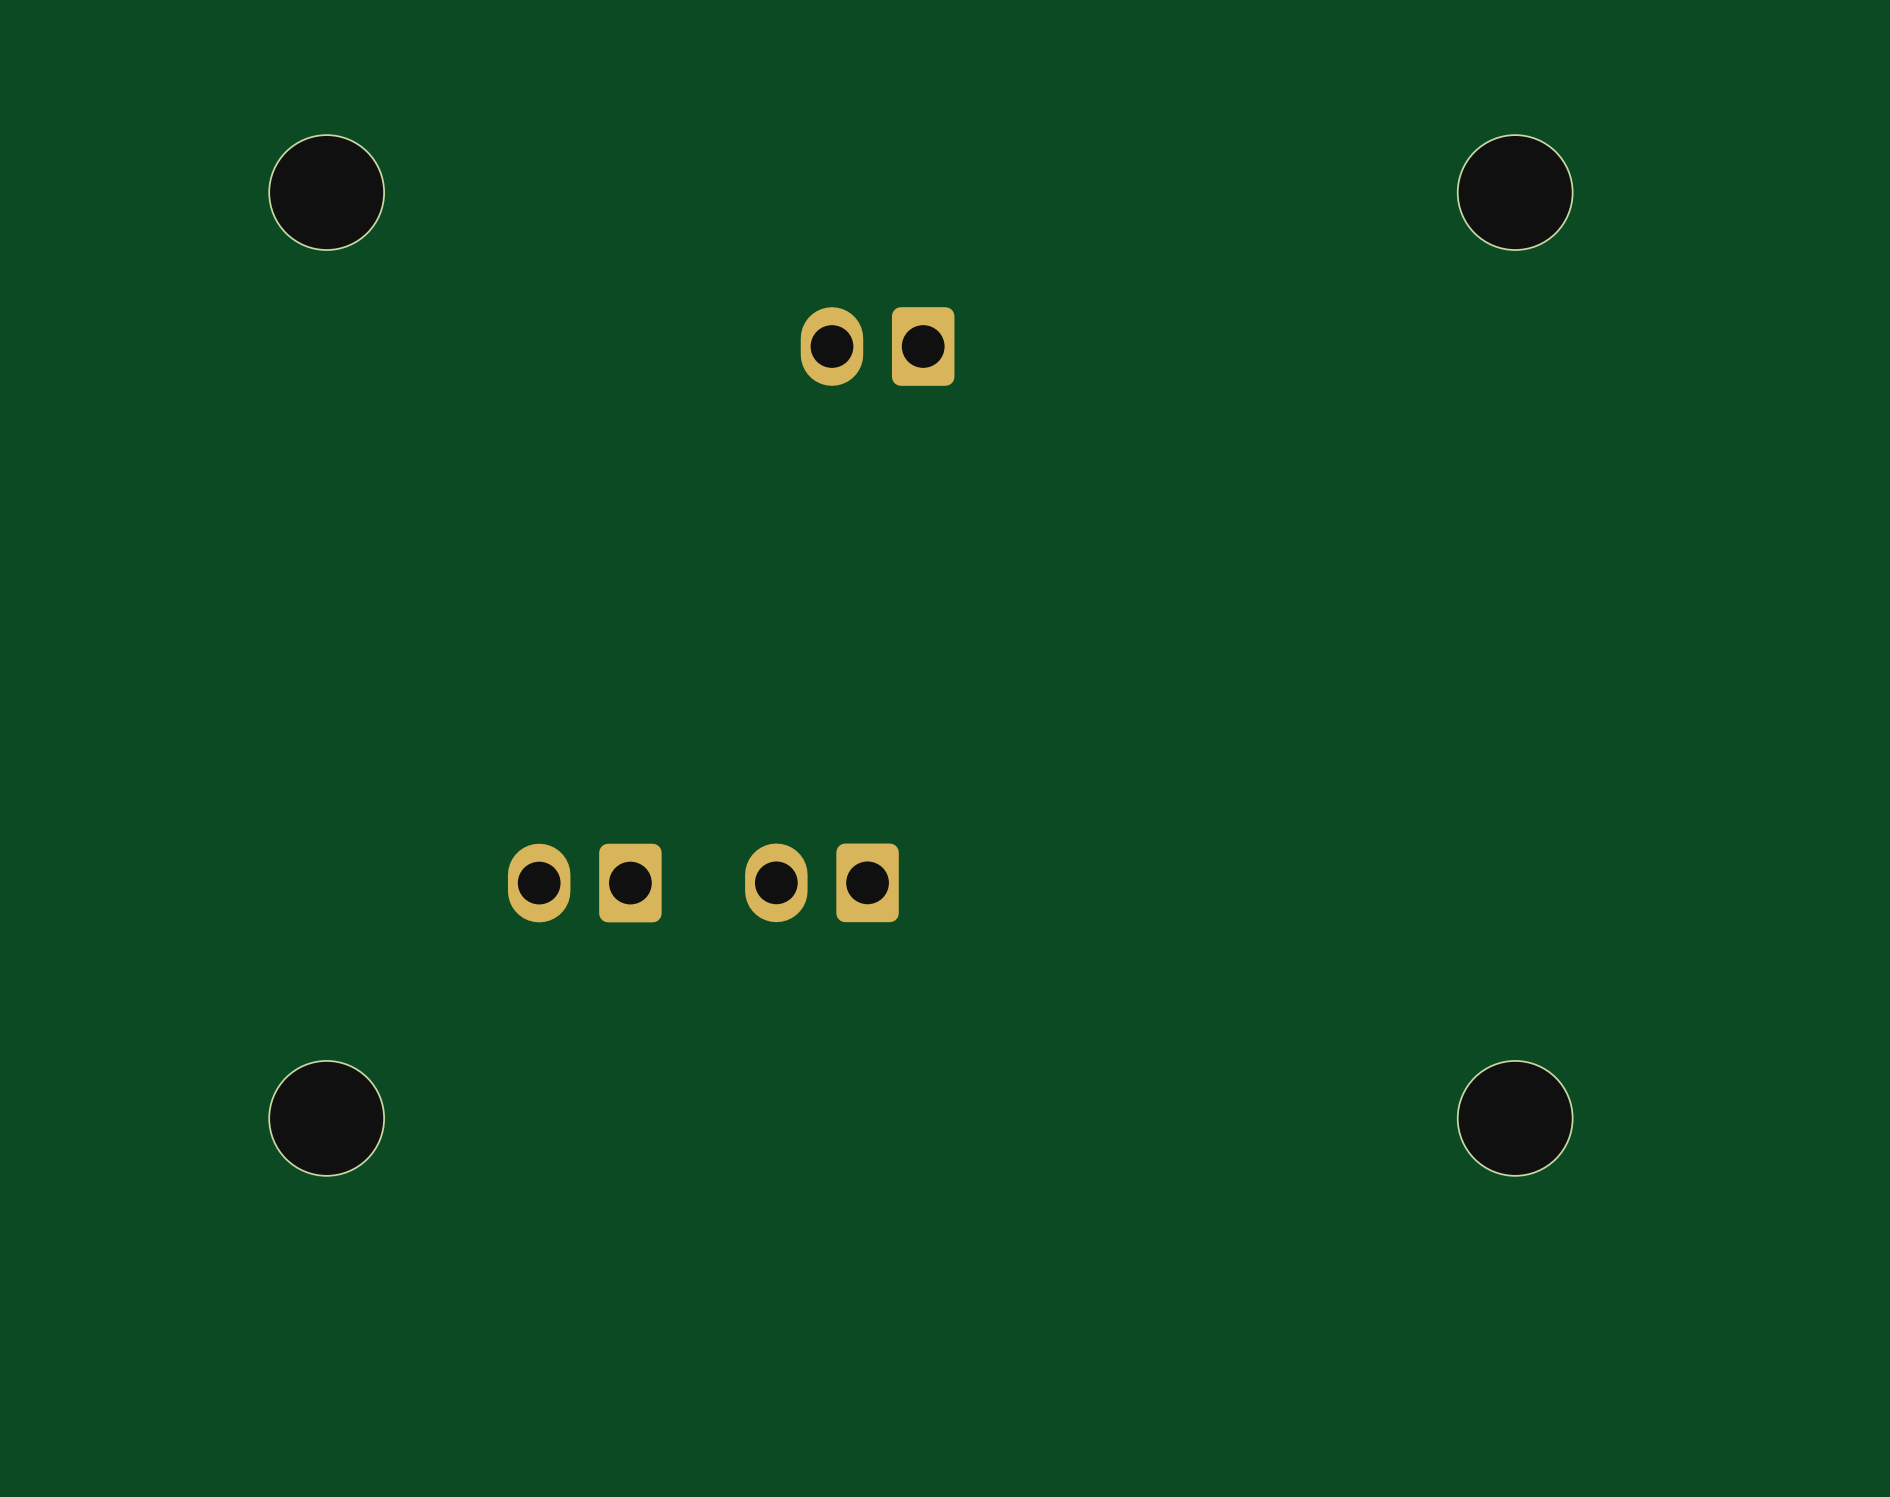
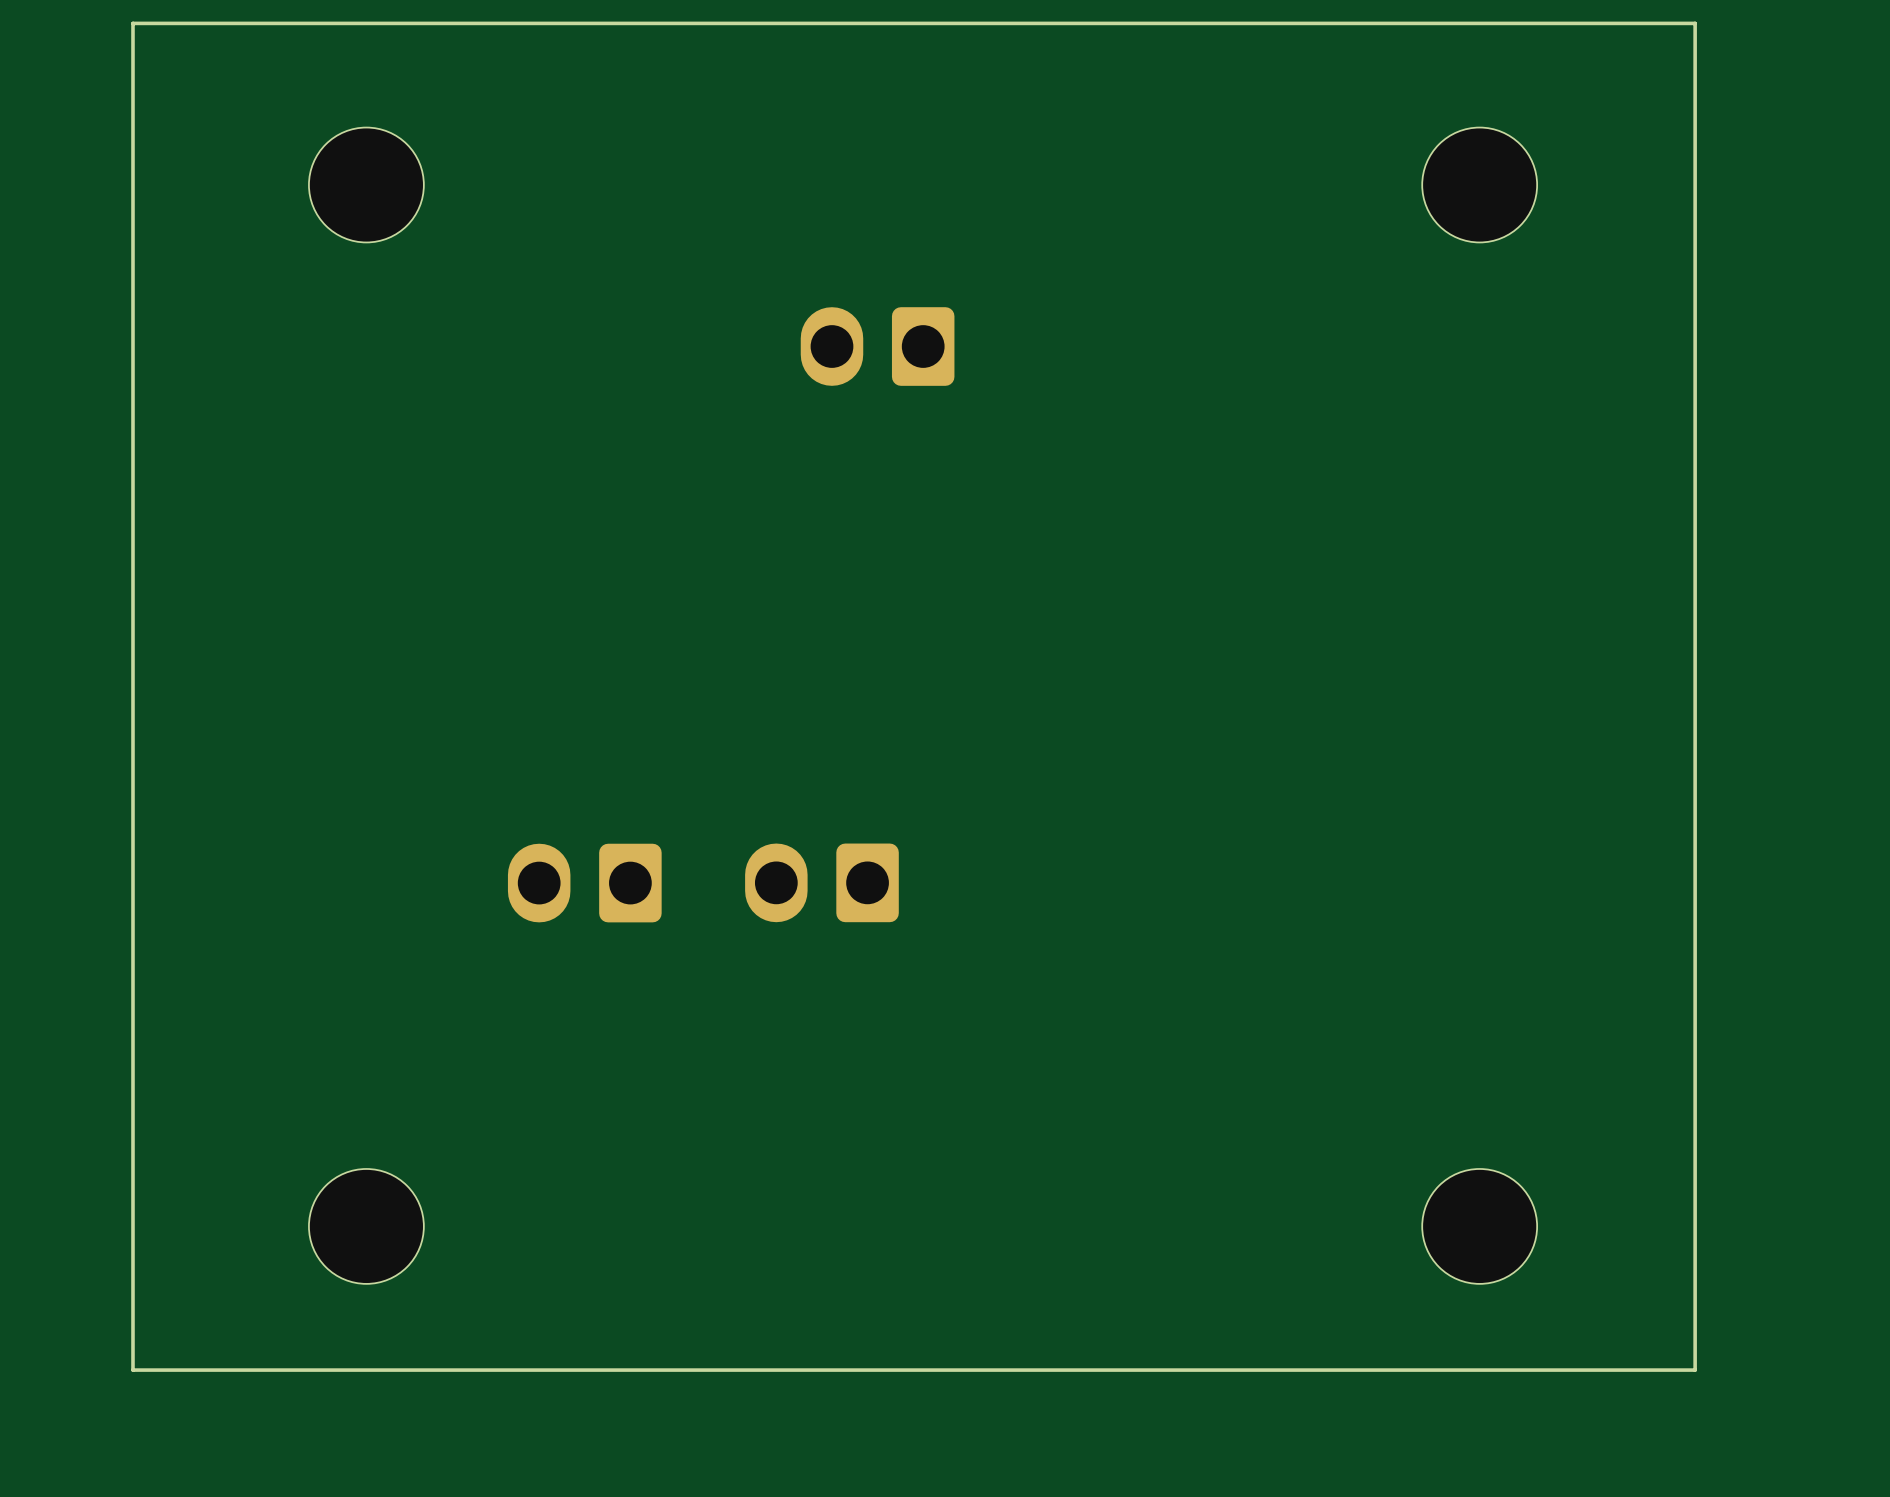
board edge: none -> (1695, 23) (132, 23) (132, 1370) (1695, 1370) (1695, 23)
part position: (326, 192) -> (366, 185)
part position: (1515, 192) -> (1479, 185)
part position: (326, 1118) -> (366, 1226)
part position: (1515, 1118) -> (1479, 1226)

